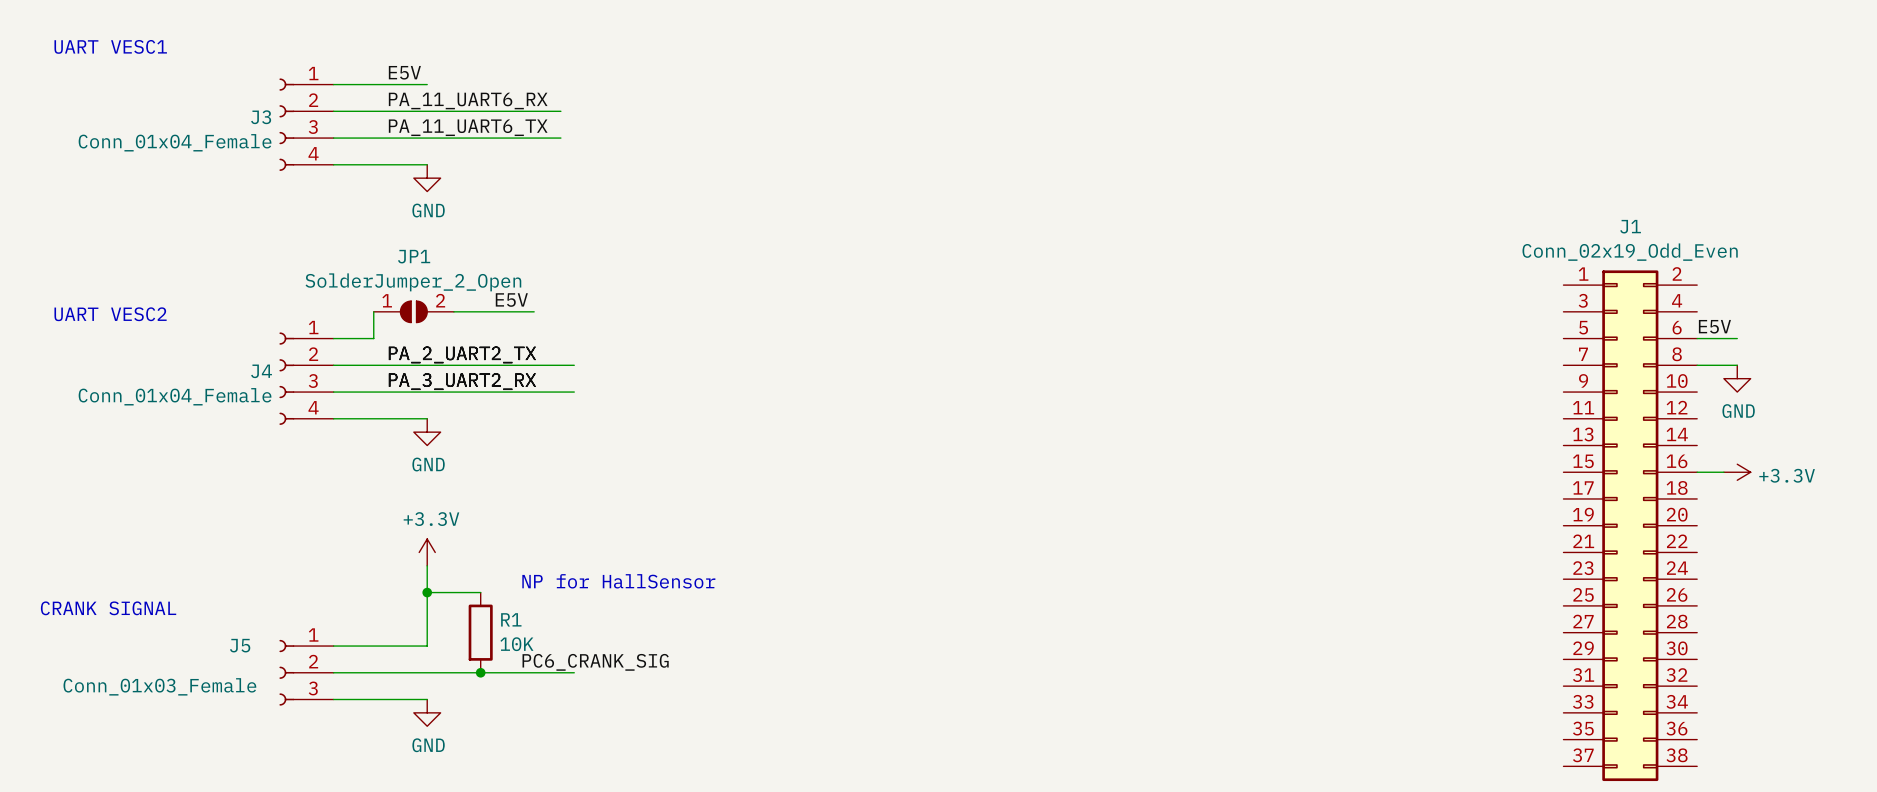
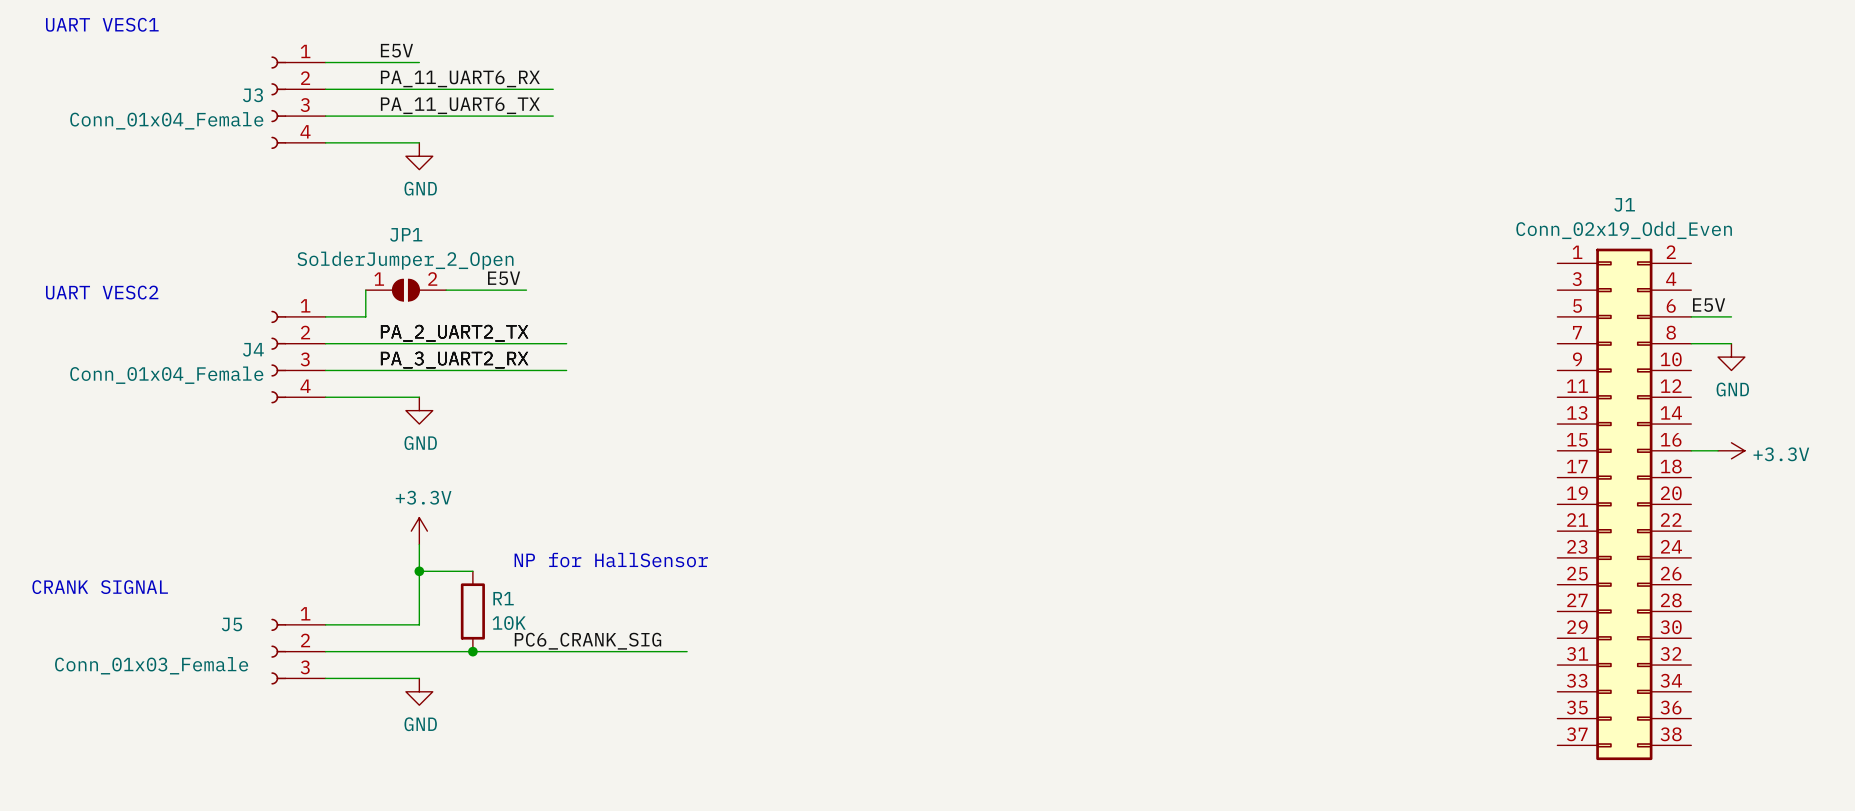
wire: none -> (566, 651) (687, 651)

